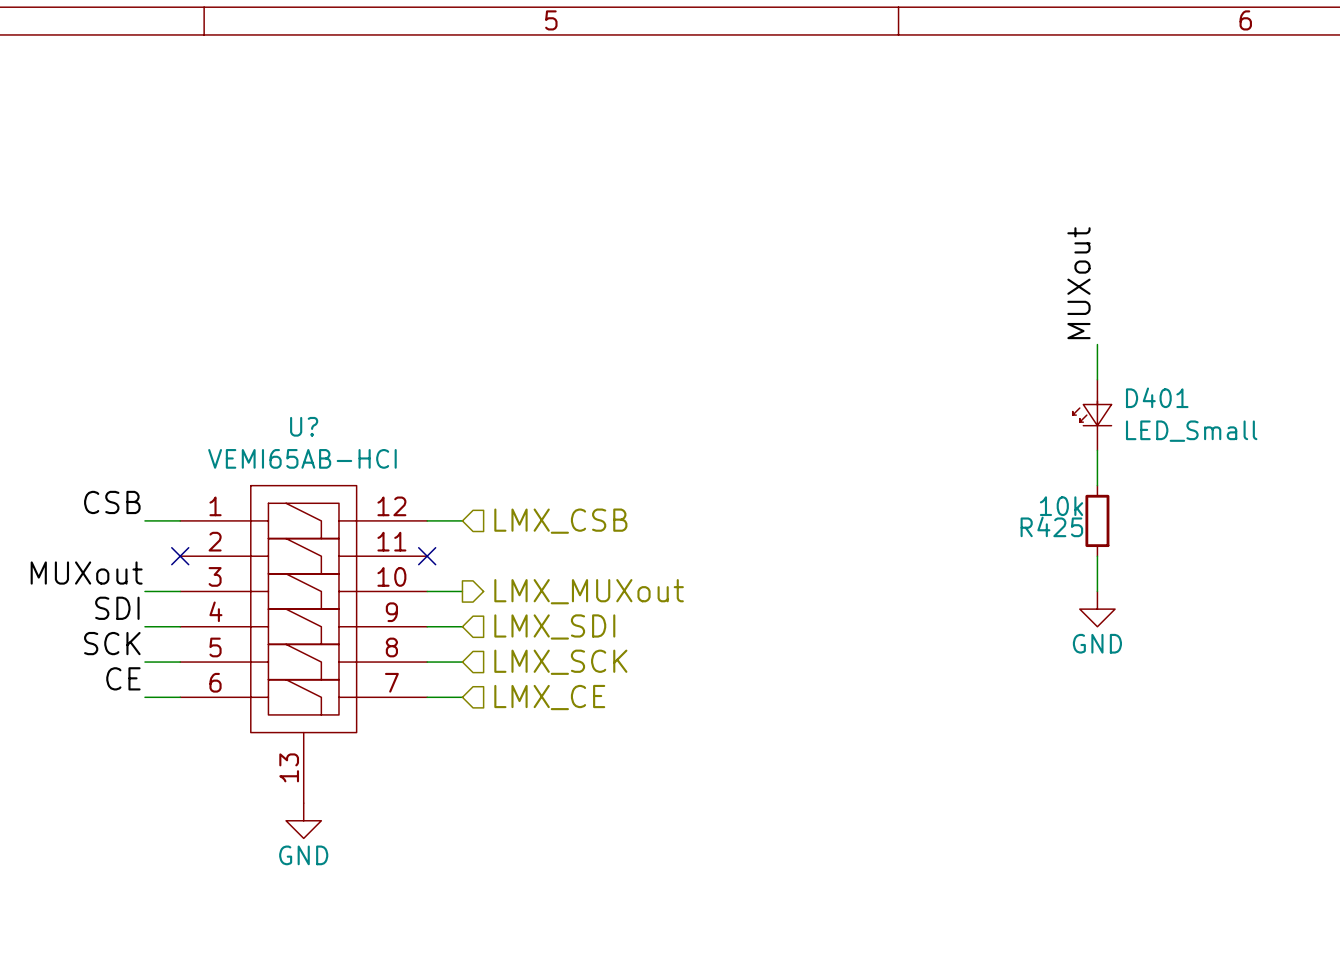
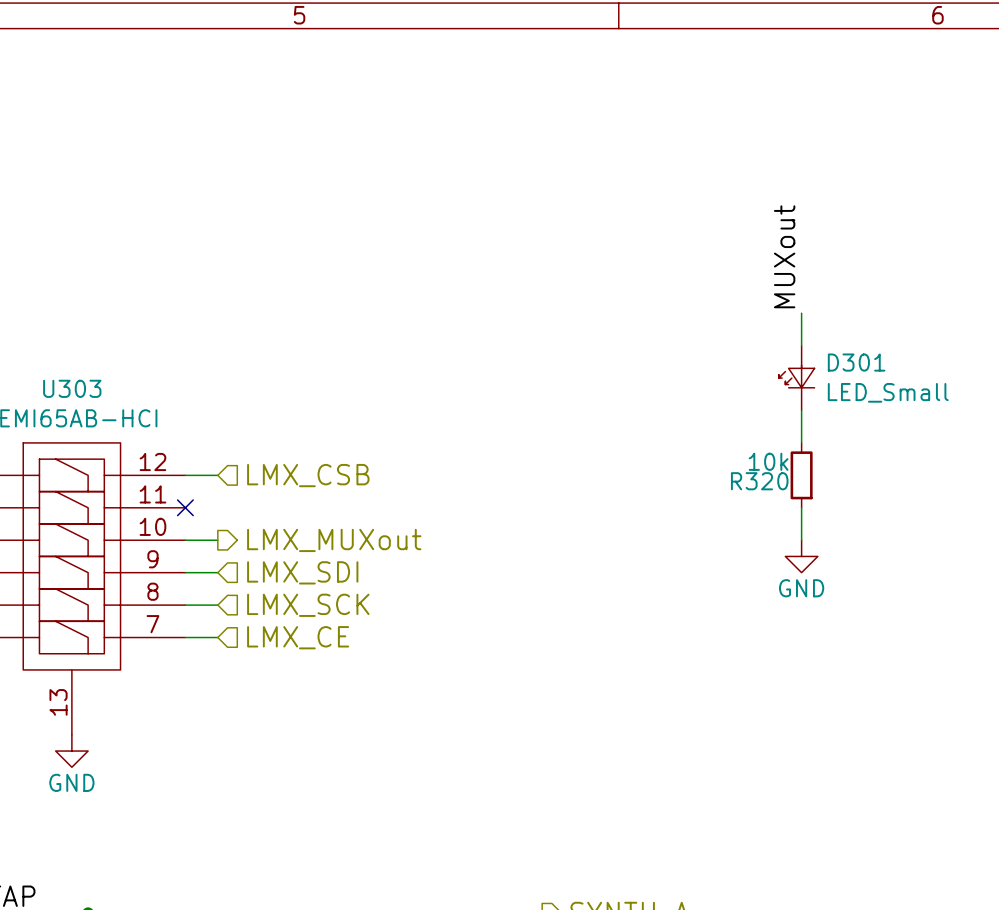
D401 name: D401 (1157, 397) -> D301 (856, 362)
U? name: U? (304, 426) -> U303 (72, 388)
R425 name: R425 (1051, 526) -> R320 (759, 481)

